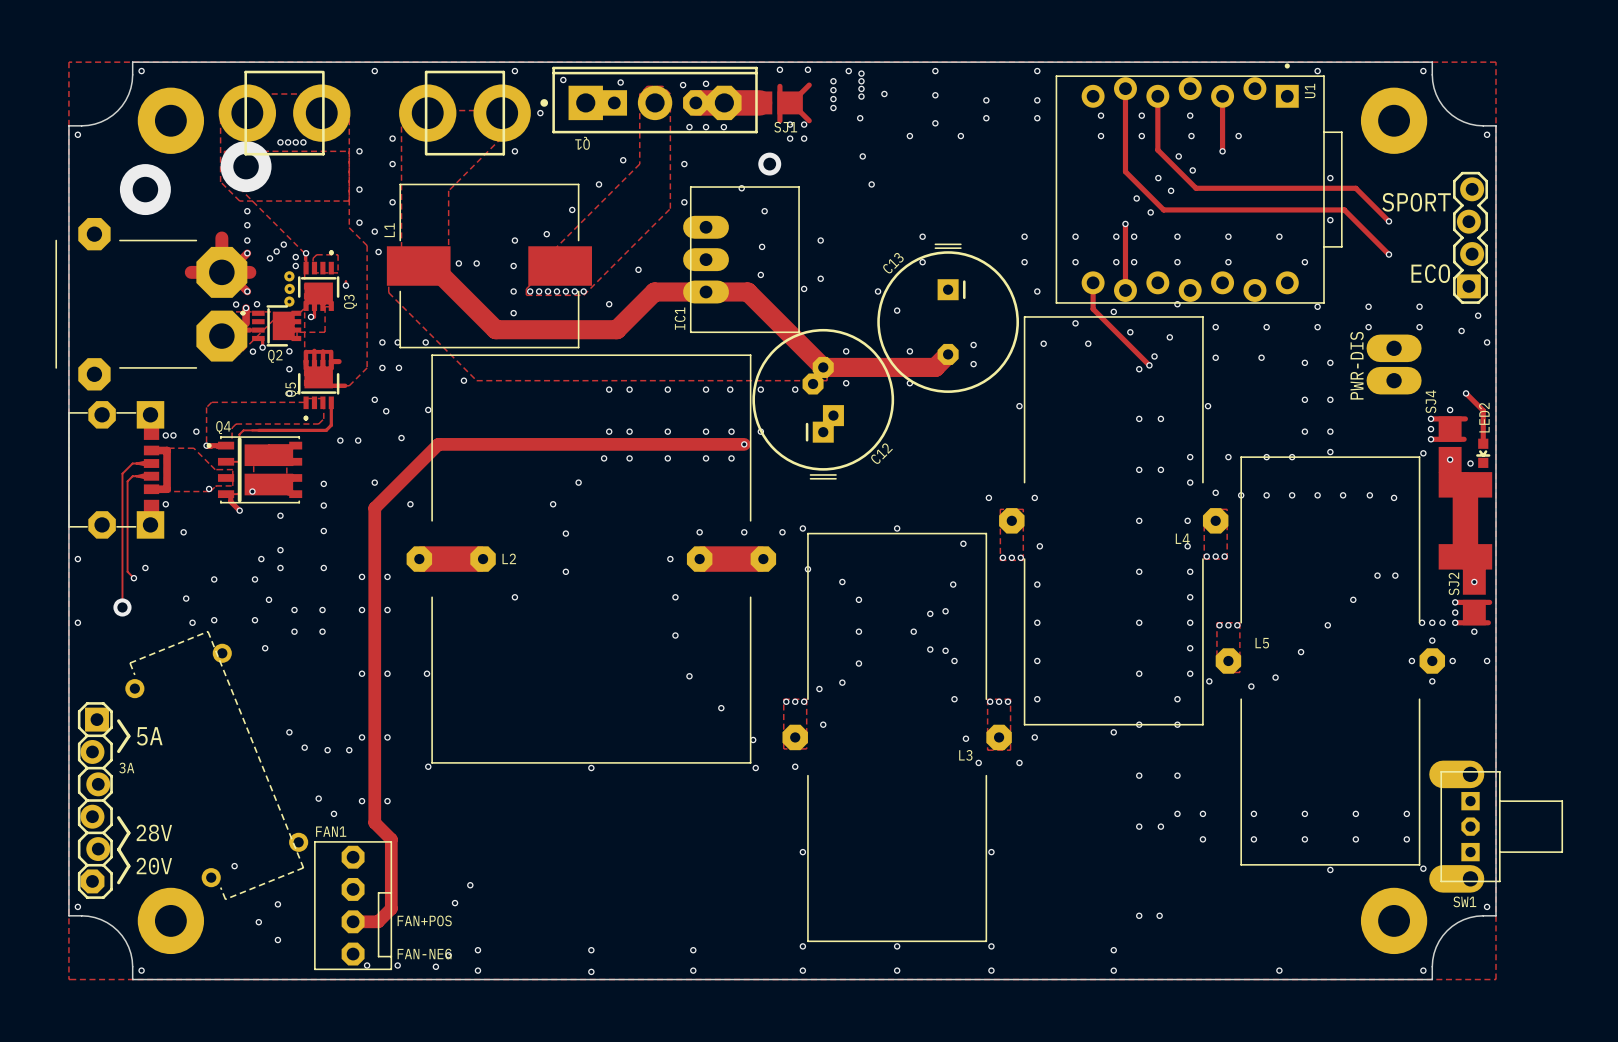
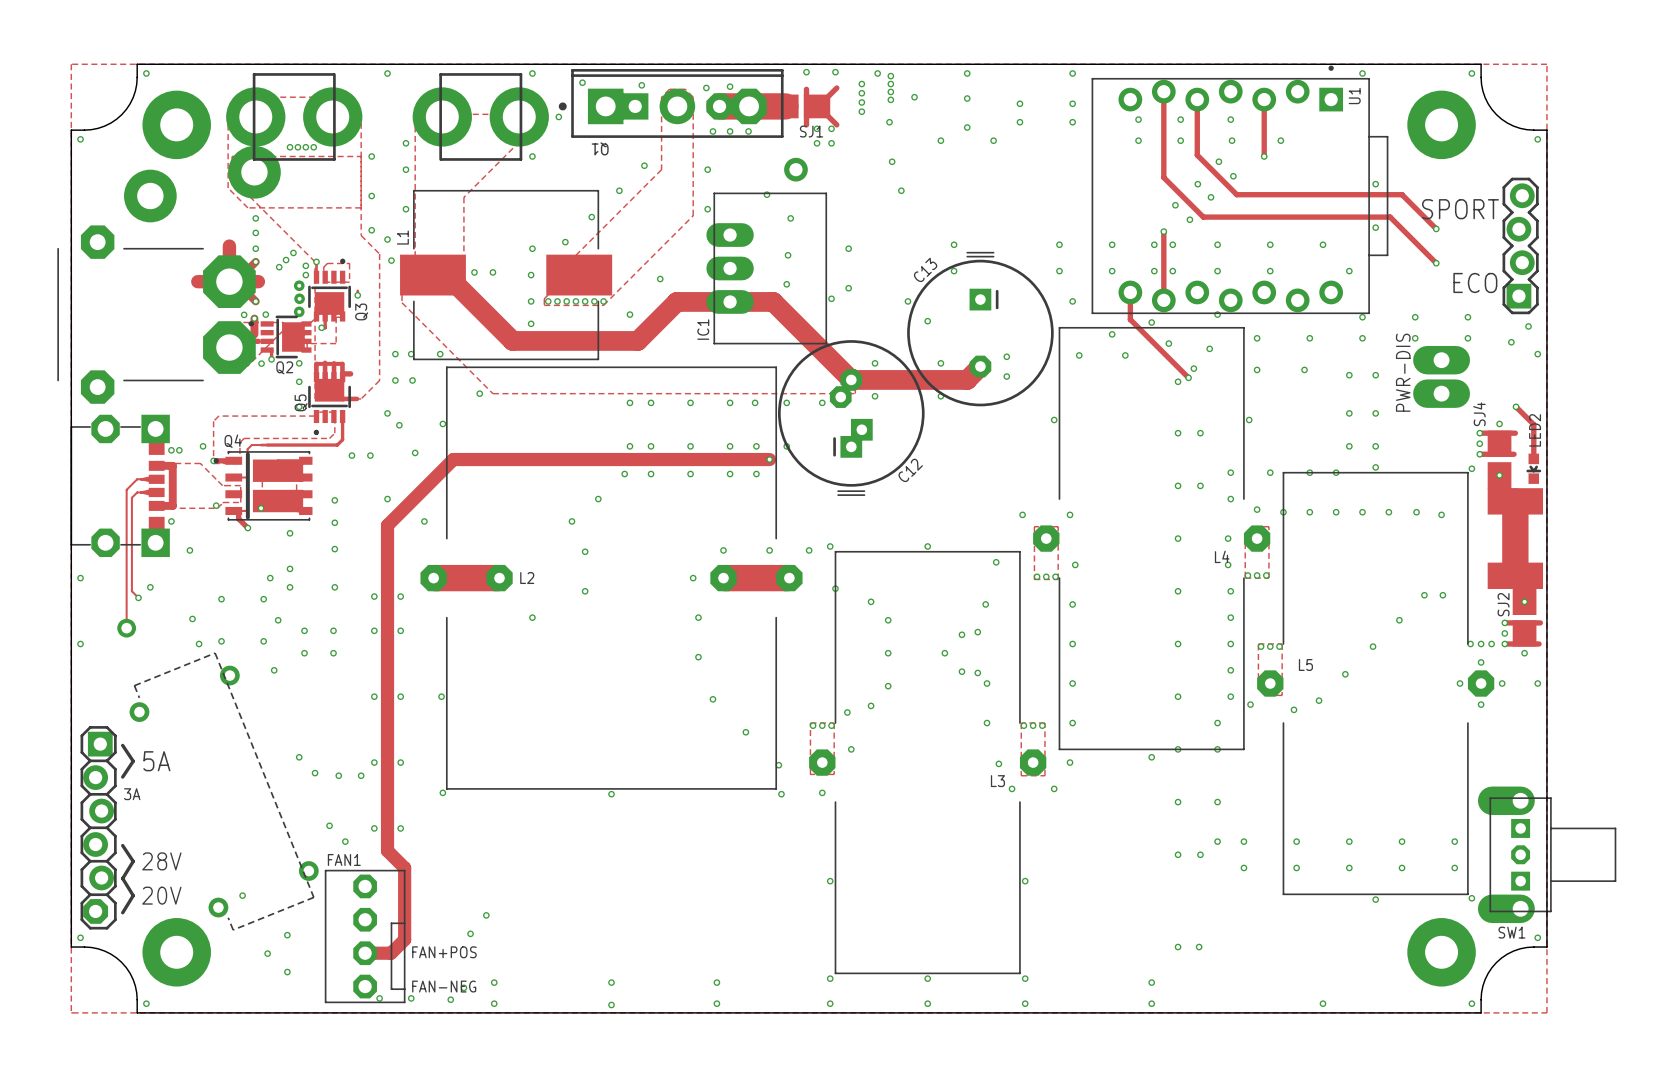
via: (1470, 463) -> none

